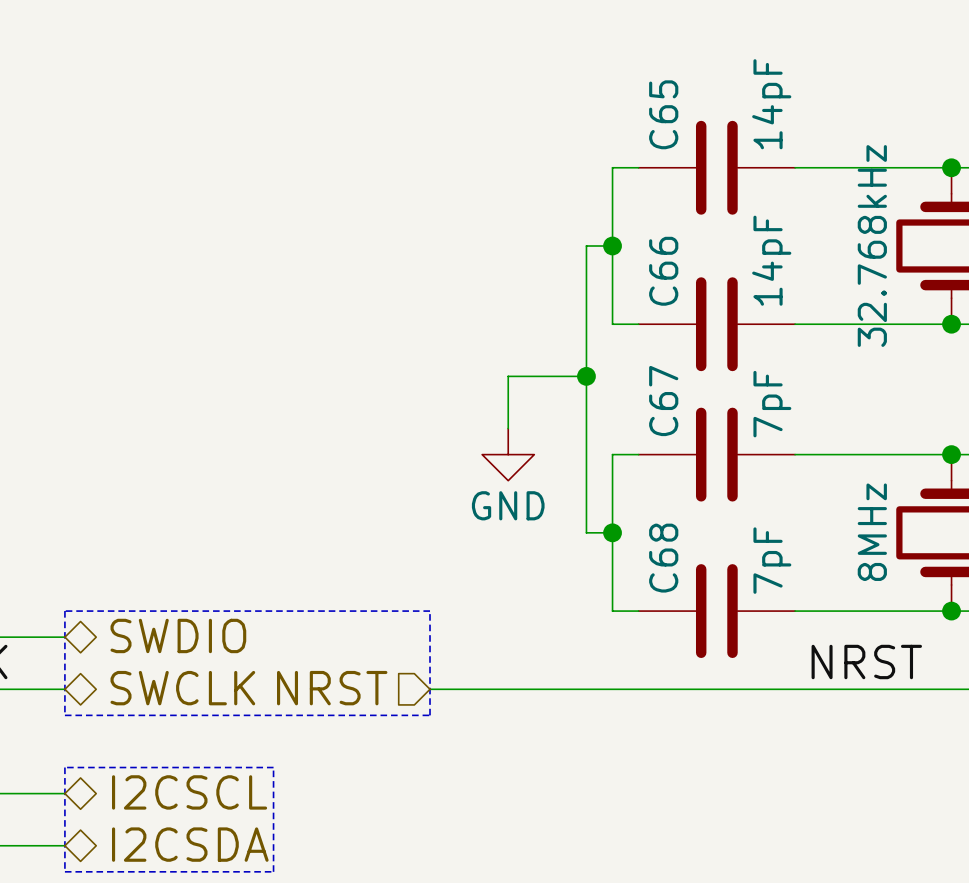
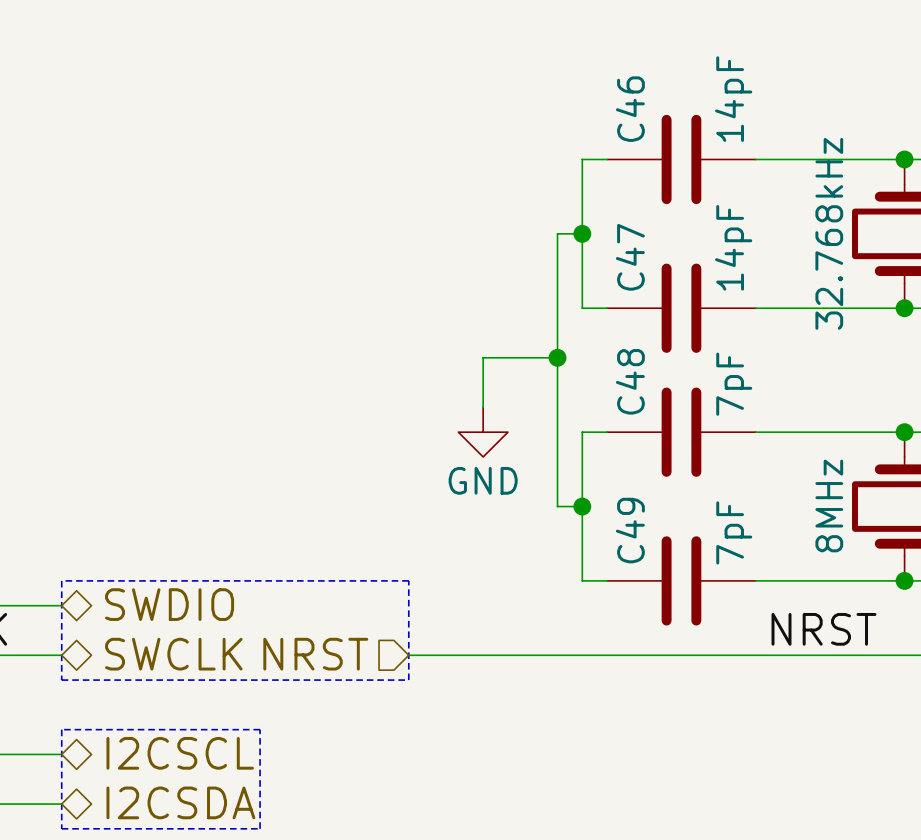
C65 name: C65 (663, 114) -> C46 (630, 109)
C66 name: C66 (663, 271) -> C47 (630, 257)
C67 name: C67 (663, 401) -> C48 (630, 381)
C68 name: C68 (663, 558) -> C49 (630, 530)

